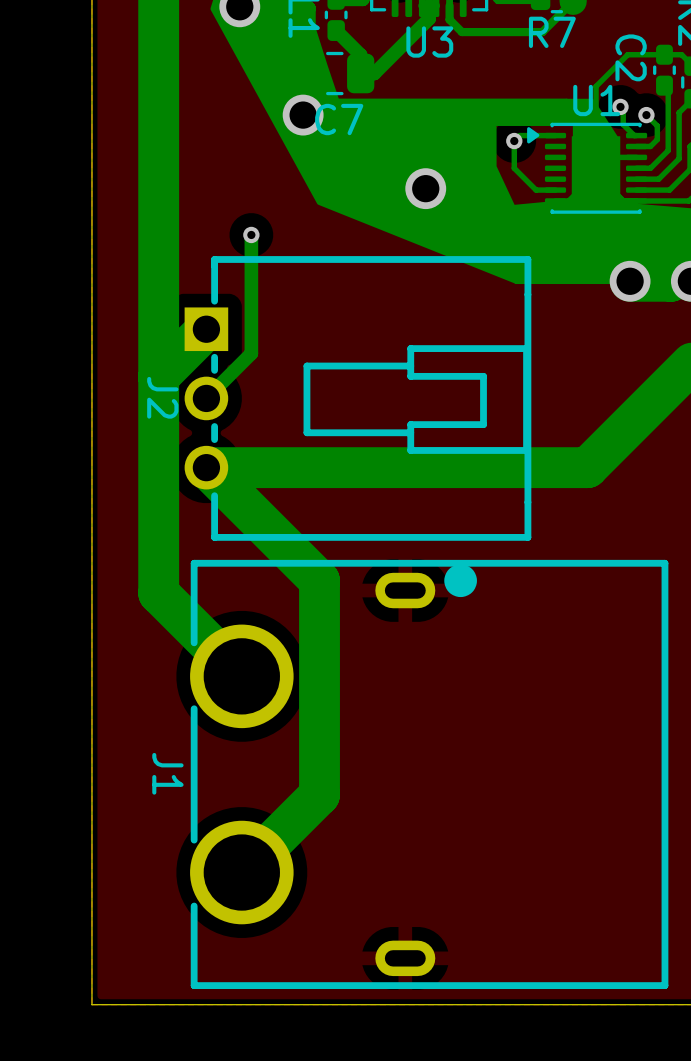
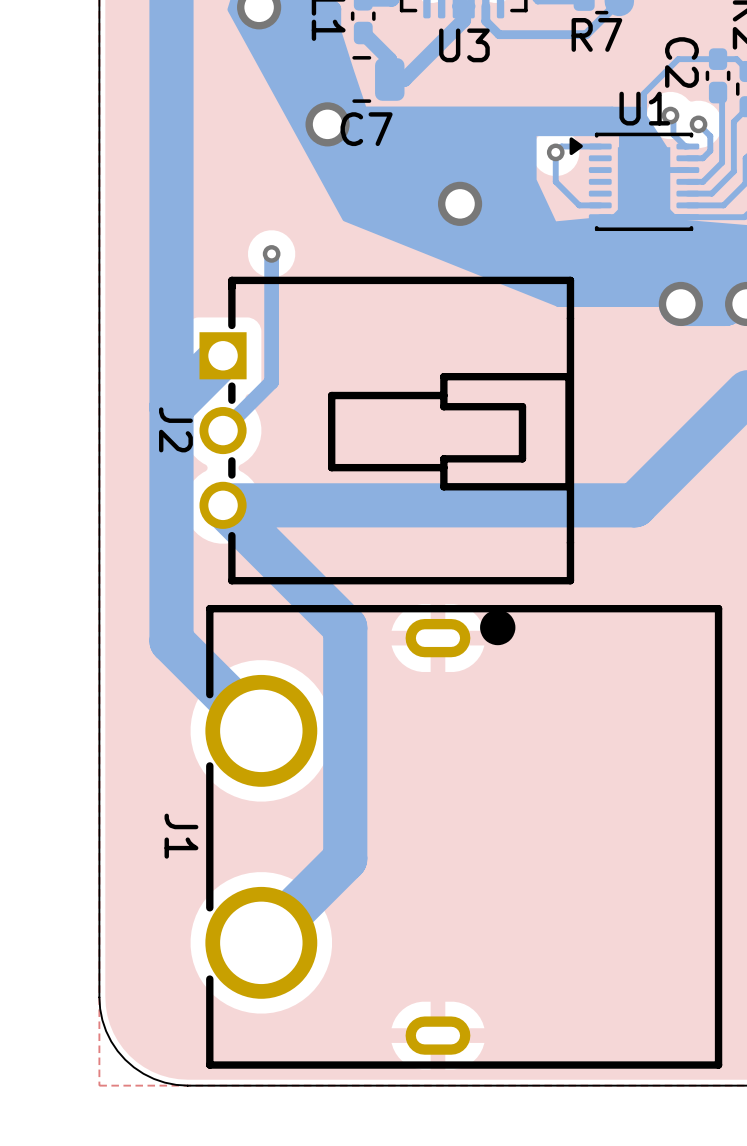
board edge: (91, 922) (91, 1004) (173, 1004) -> (99, 997) (100, 1008) (106, 1031) (117, 1051) (125, 1059) (143, 1073) (153, 1078) (164, 1082) (187, 1085)

